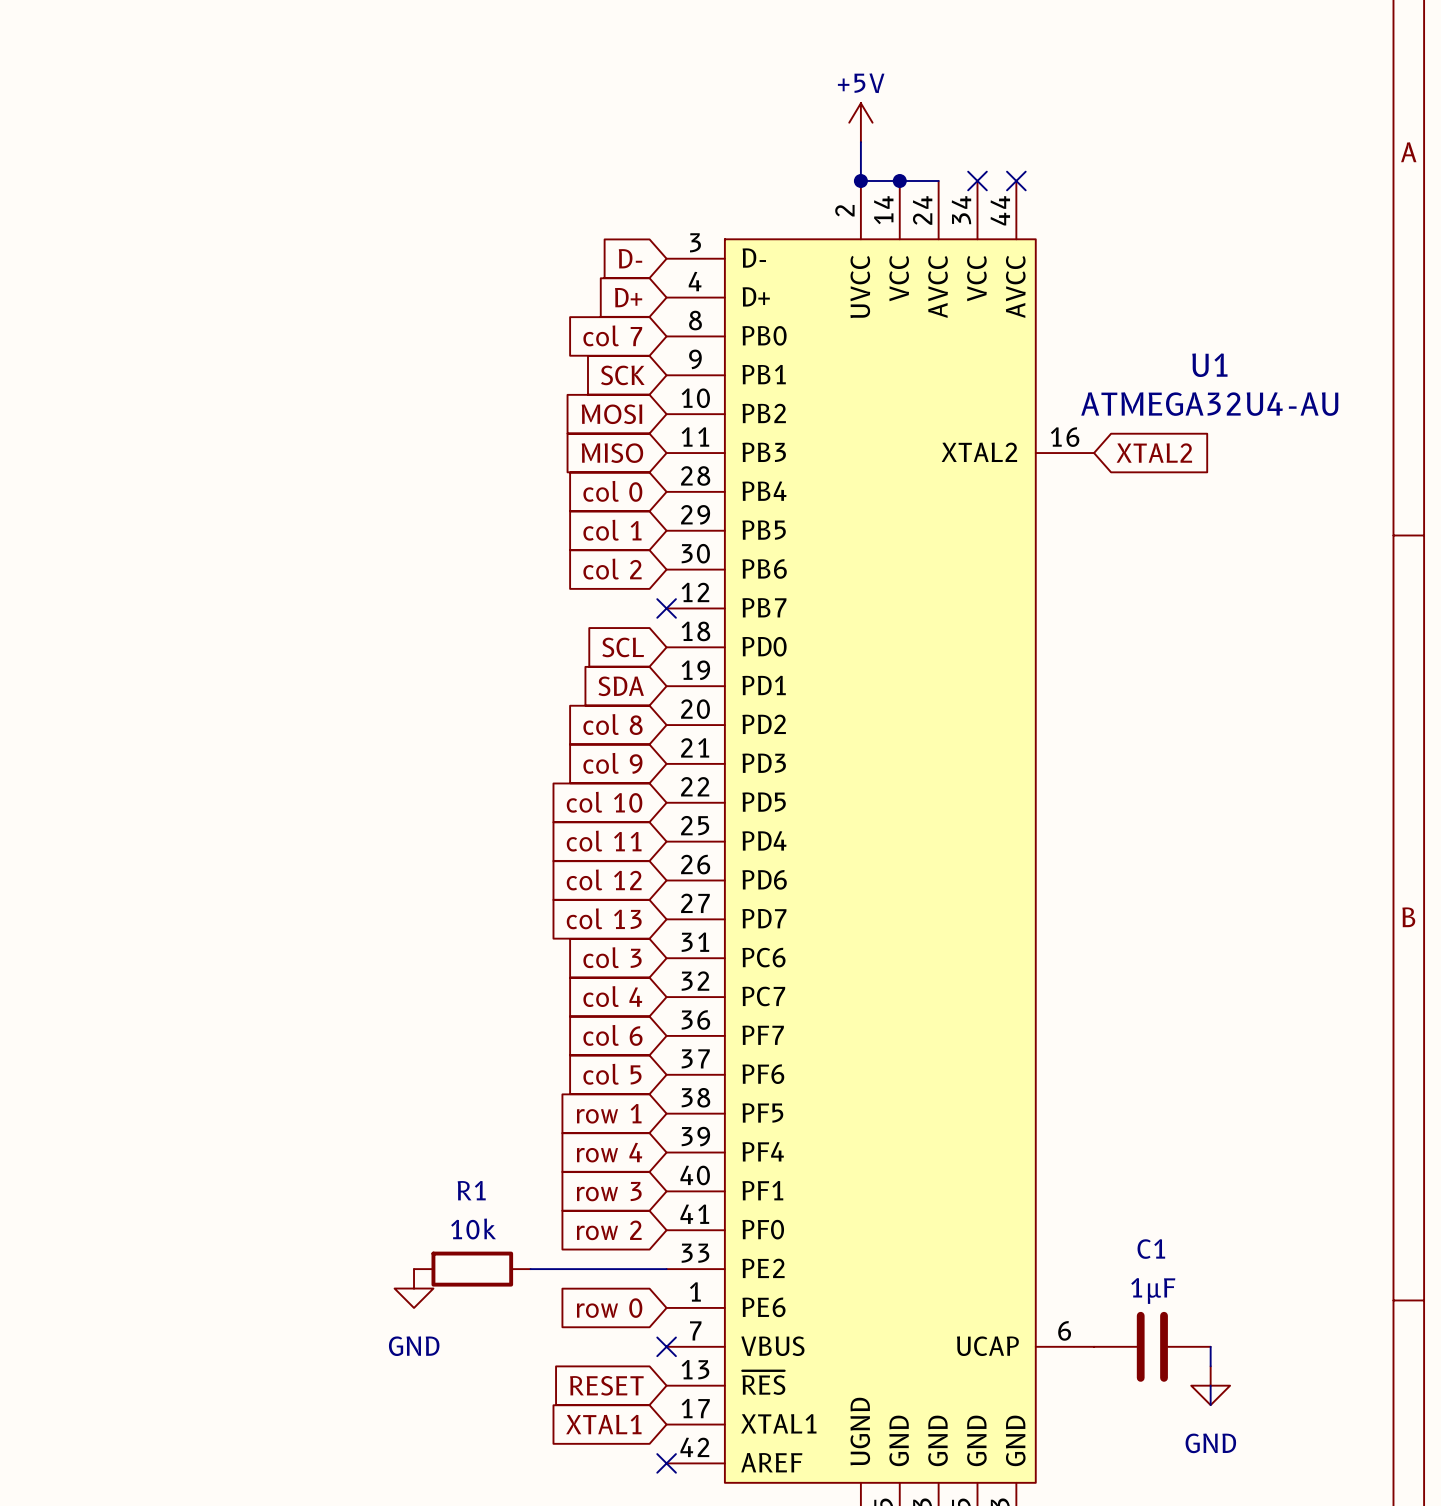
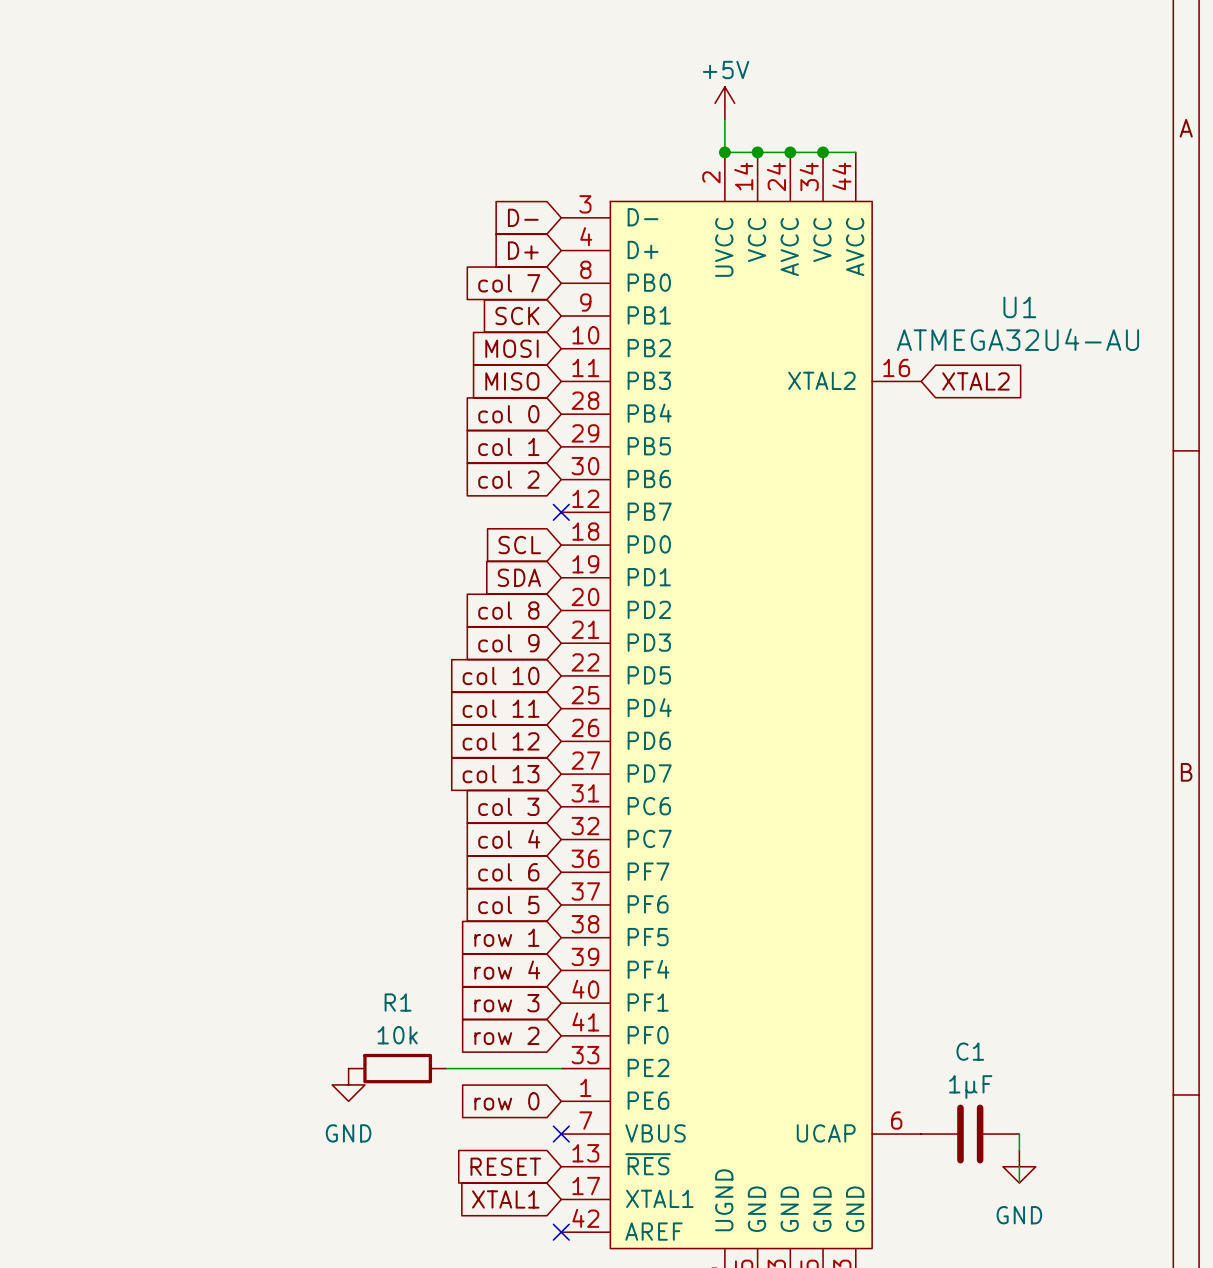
wire: none -> (790, 152) (855, 152)
junction: none -> (790, 152)
no-connect mark: (977, 180) -> none
junction: none -> (823, 152)
no-connect mark: (1016, 180) -> none

